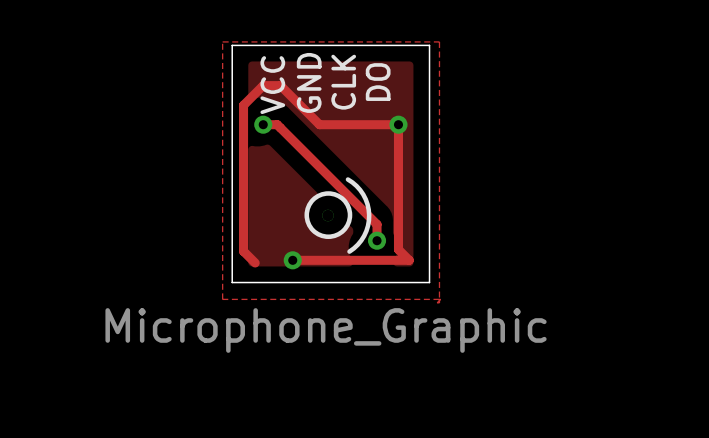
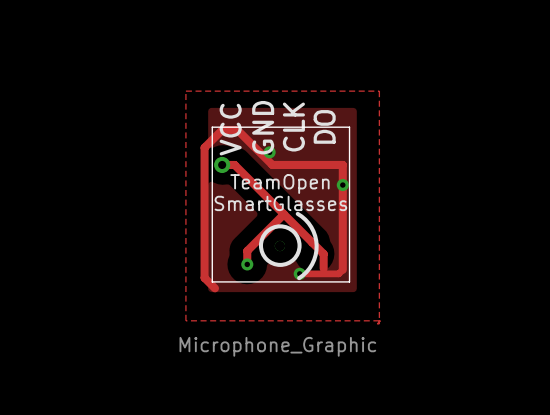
board edge: (232, 45) (232, 282) (429, 282) (429, 45) (232, 45) -> (212, 127) (212, 281) (349, 281) (349, 127) (212, 127)
via: none -> (269, 152)
via: (398, 124) -> none
text: none -> TeamOpen (279, 184)
via: none -> (342, 185)
text: none -> SmartGlasses (280, 203)
drawing shape: [105, 177, 547, 353] -> [179, 211, 377, 357]
track: none -> (283, 214) (247, 250) (247, 264)
via: none -> (247, 264)
via: (377, 240) -> none
track: (398, 242) (398, 249) (409, 260) (292, 260) -> (342, 269) (338, 273) (299, 273)
via: none -> (299, 273)
via: (292, 260) -> none

